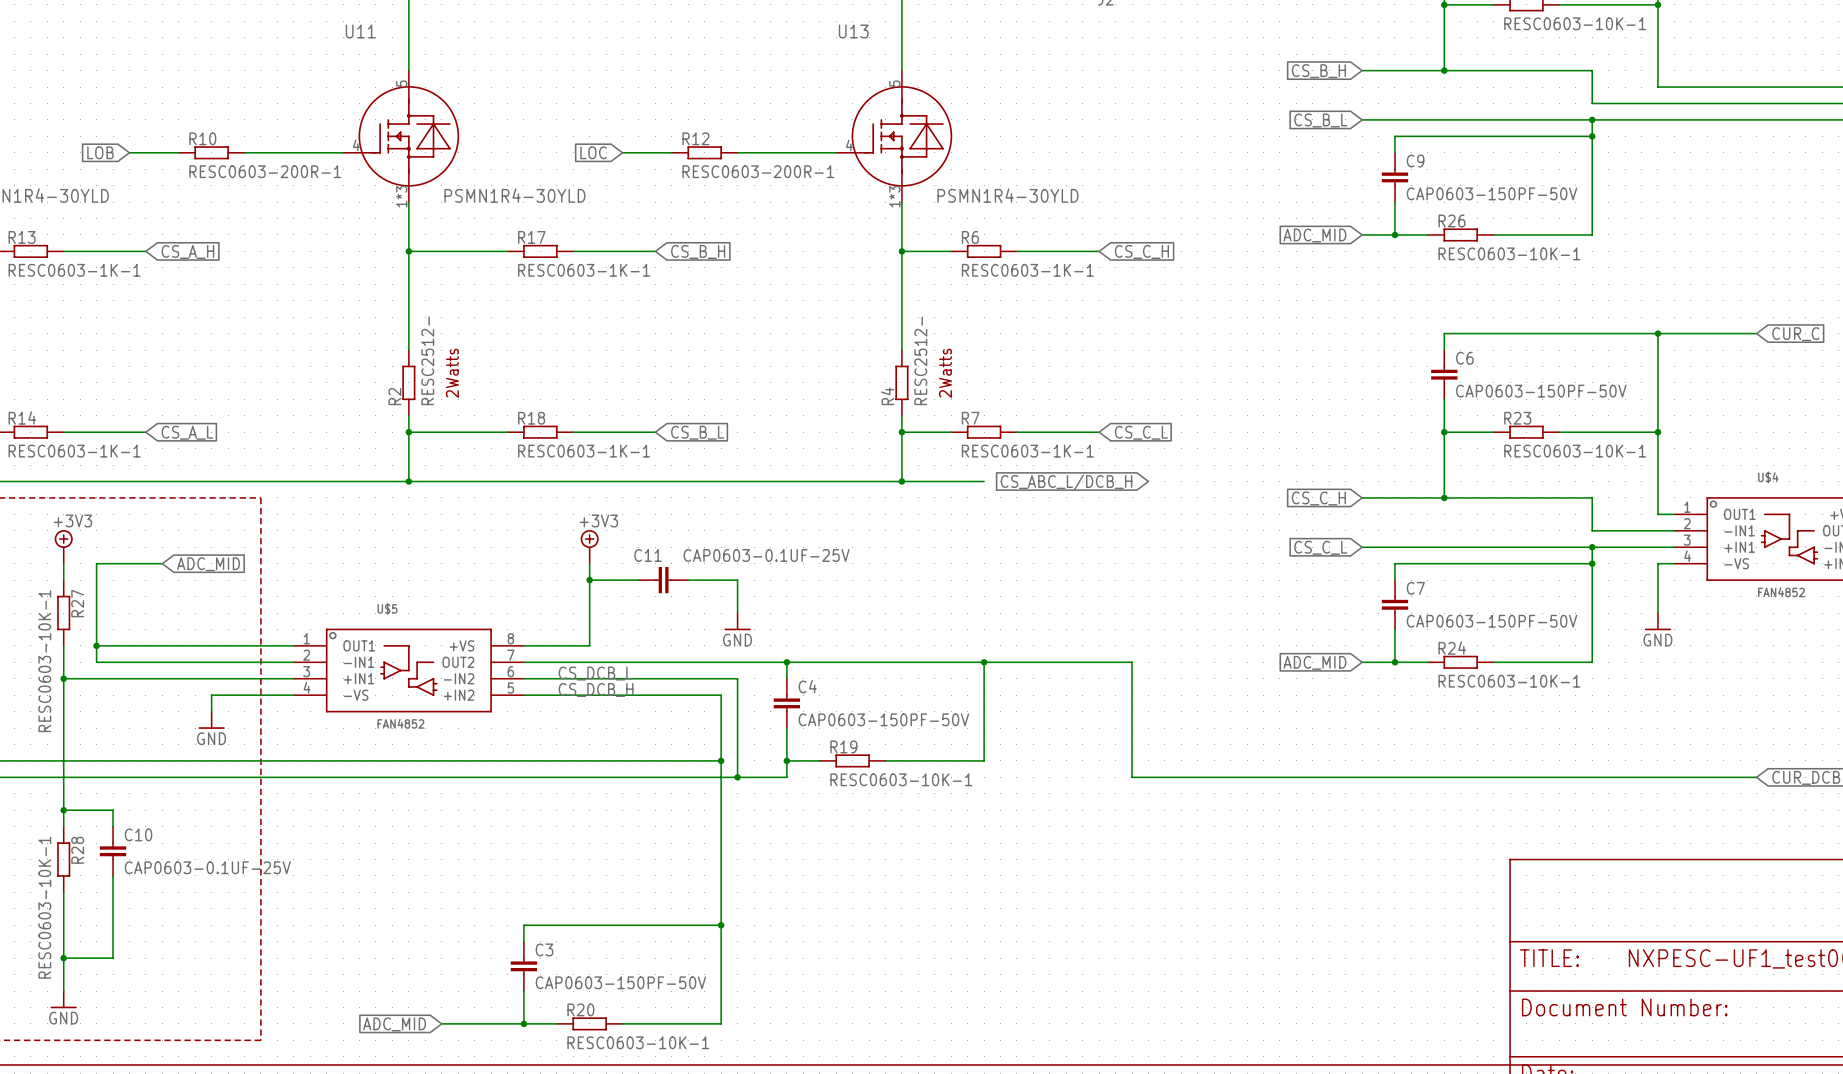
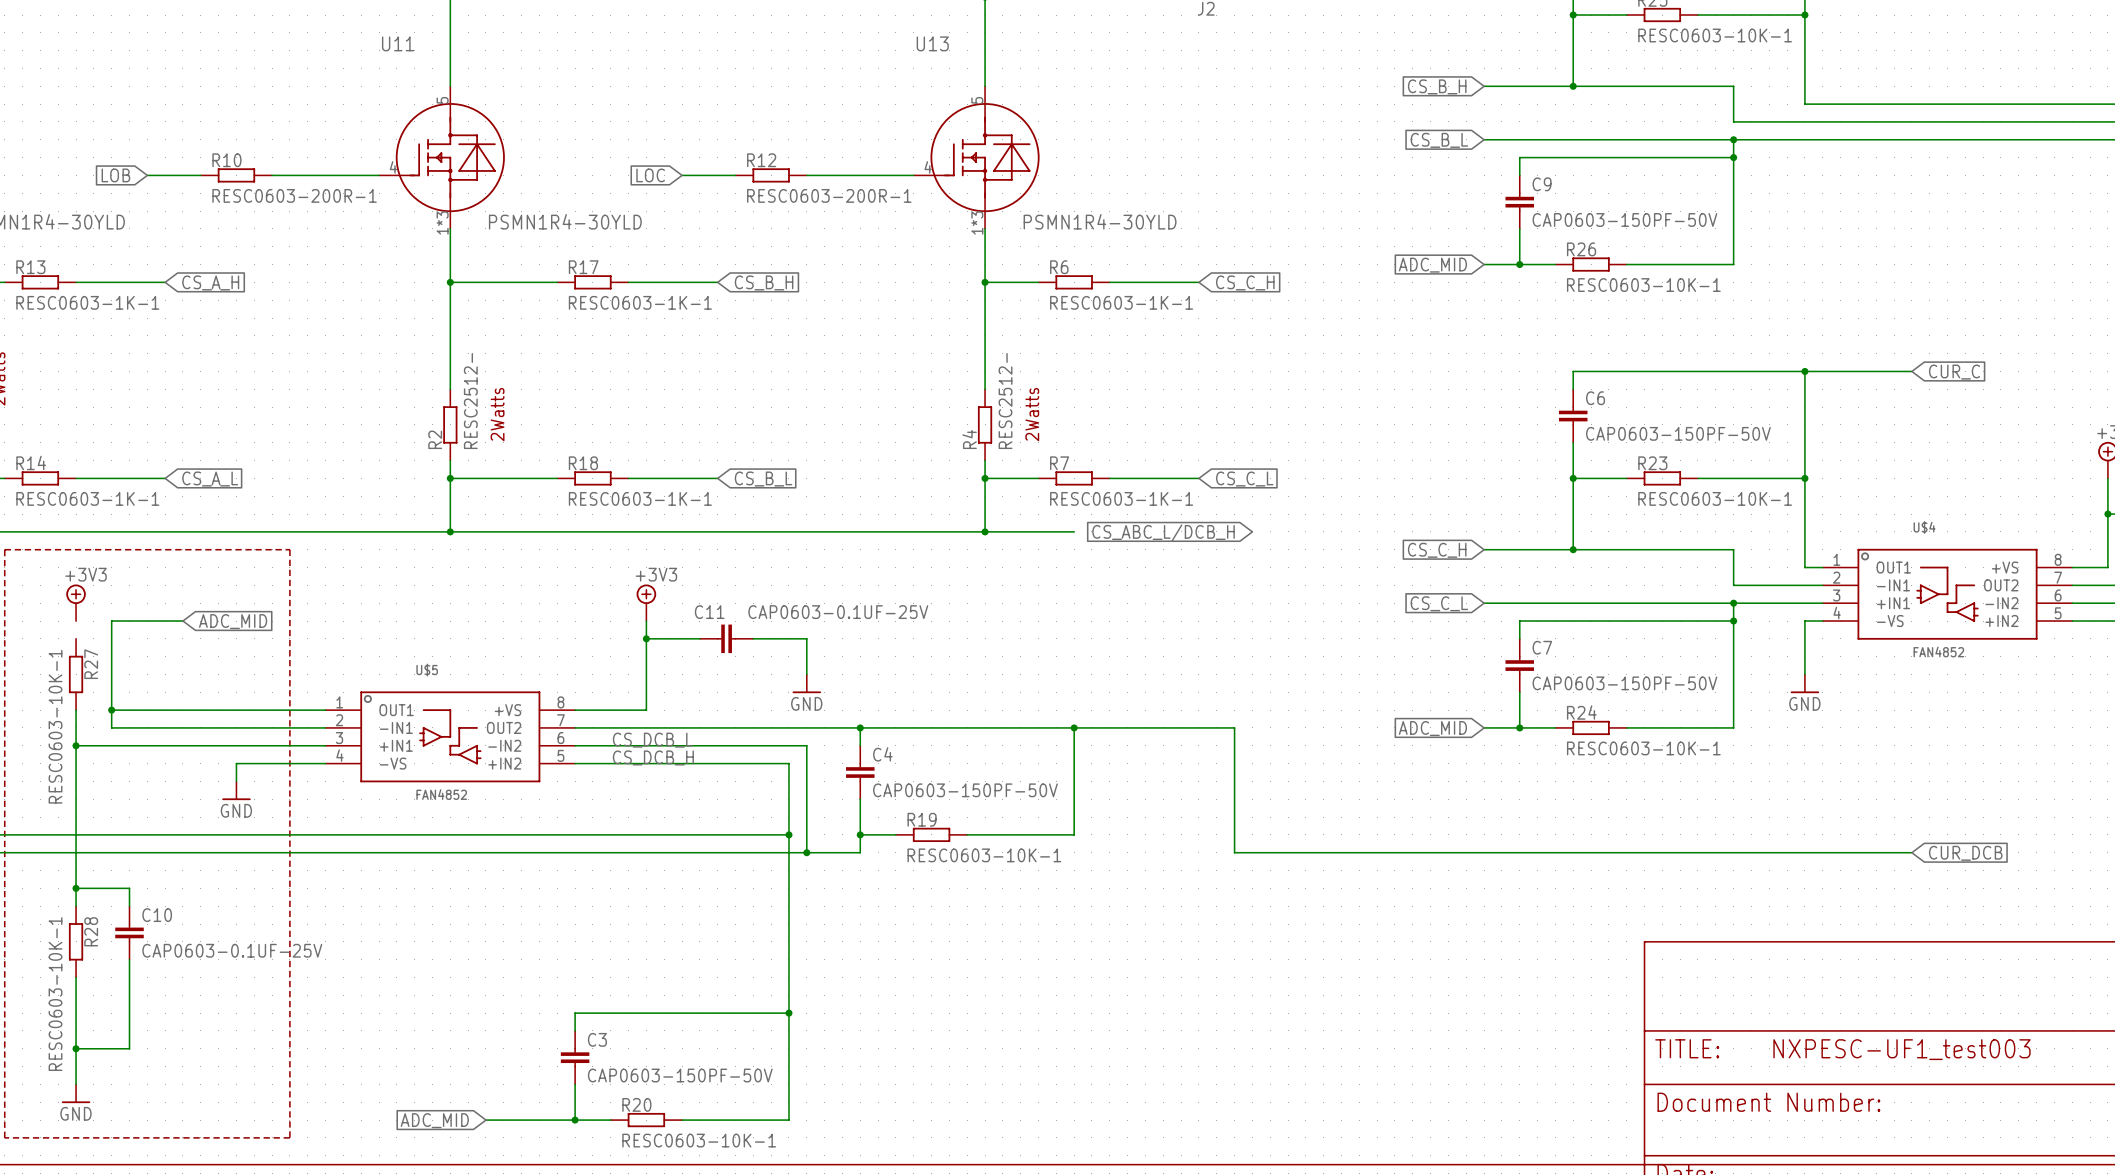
wire: (63, 563) (63, 580) -> none

